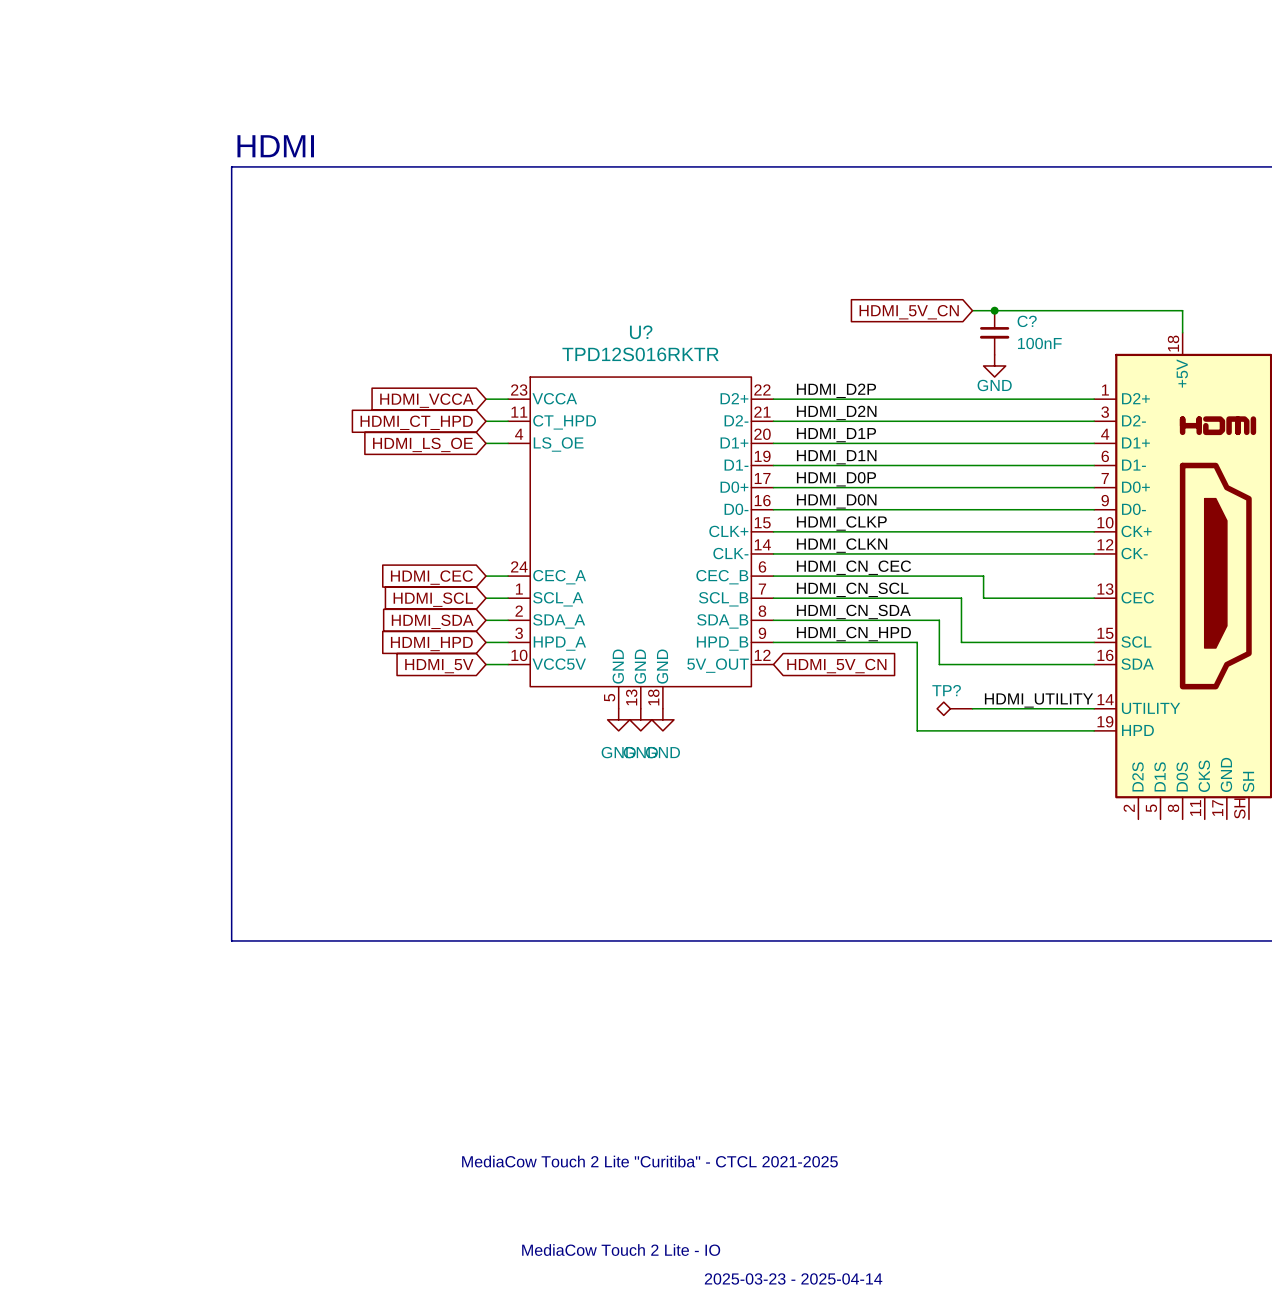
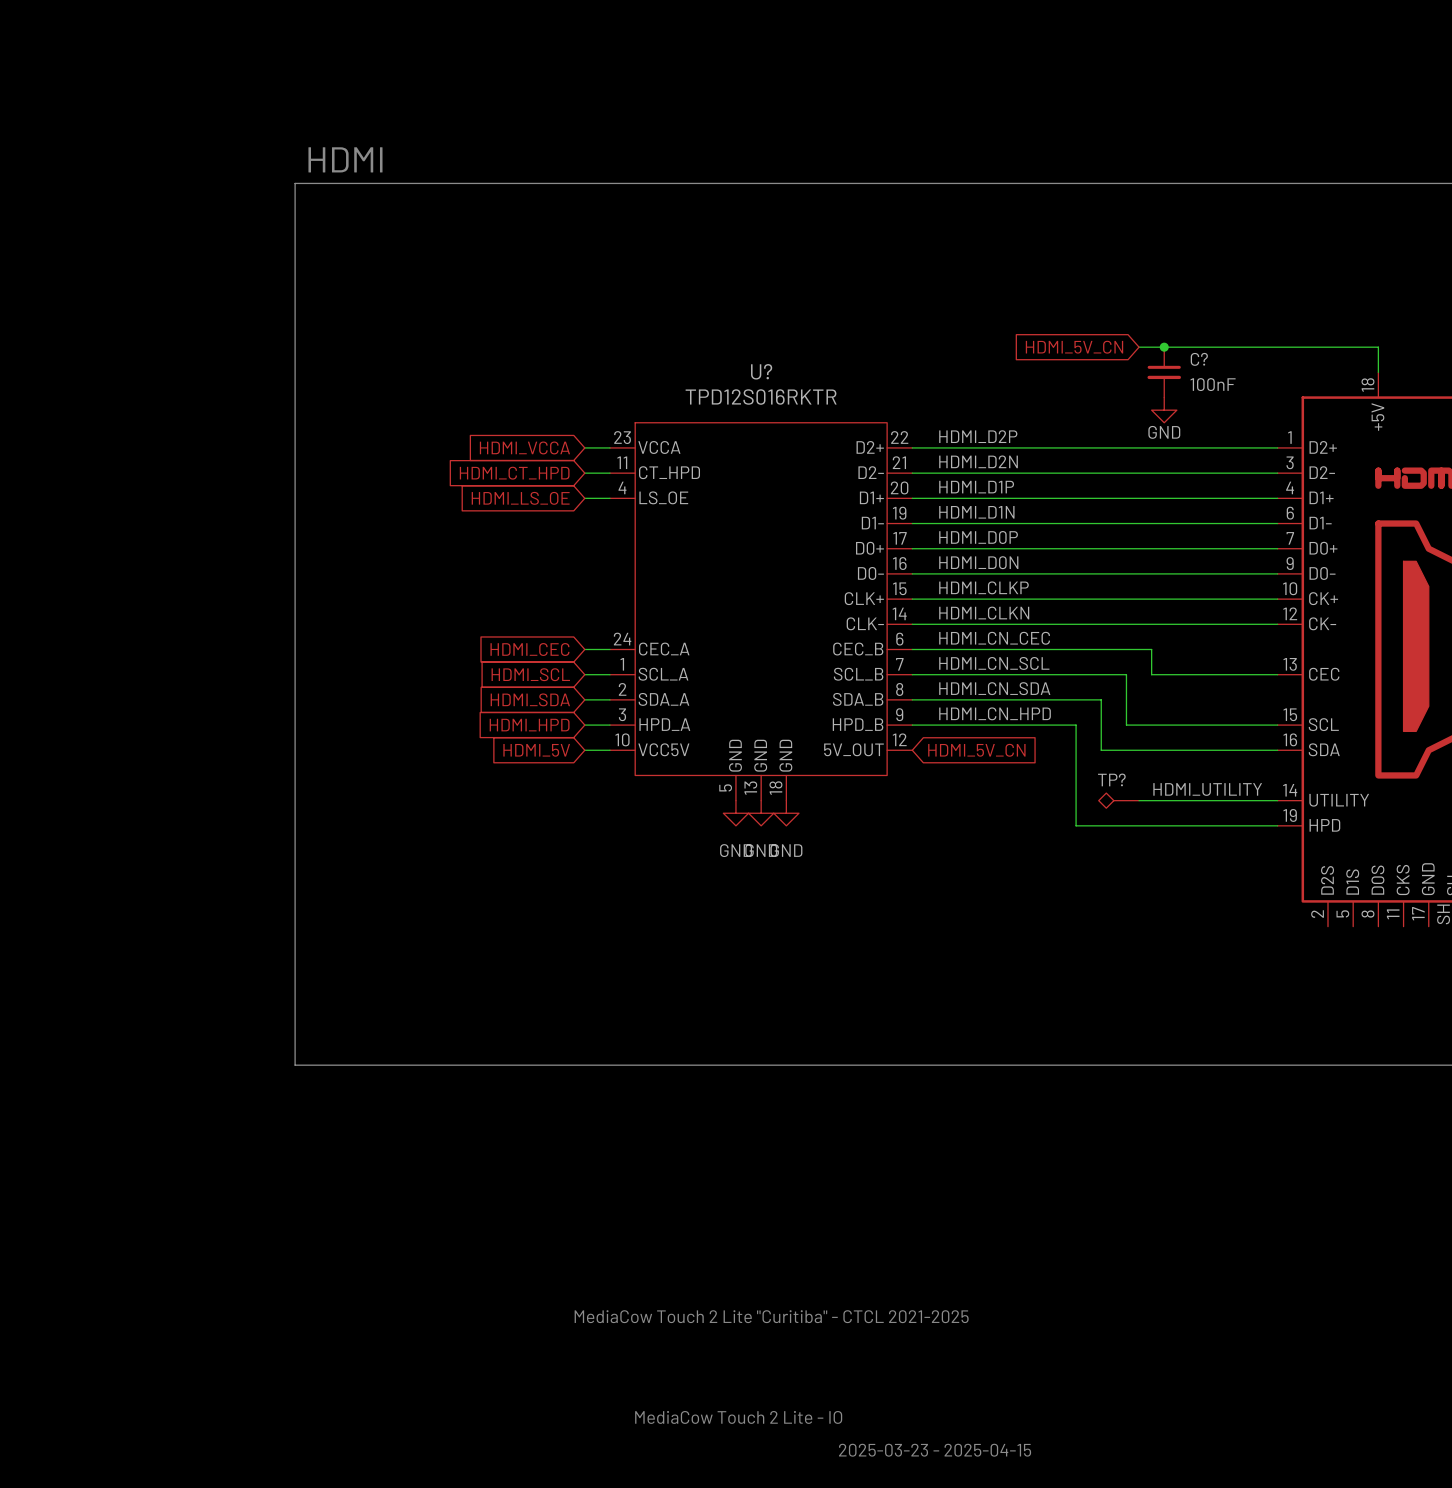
text: 2025-03-23 - 2025-04-14 (793, 1278) -> 2025-03-23 - 2025-04-15 (935, 1450)

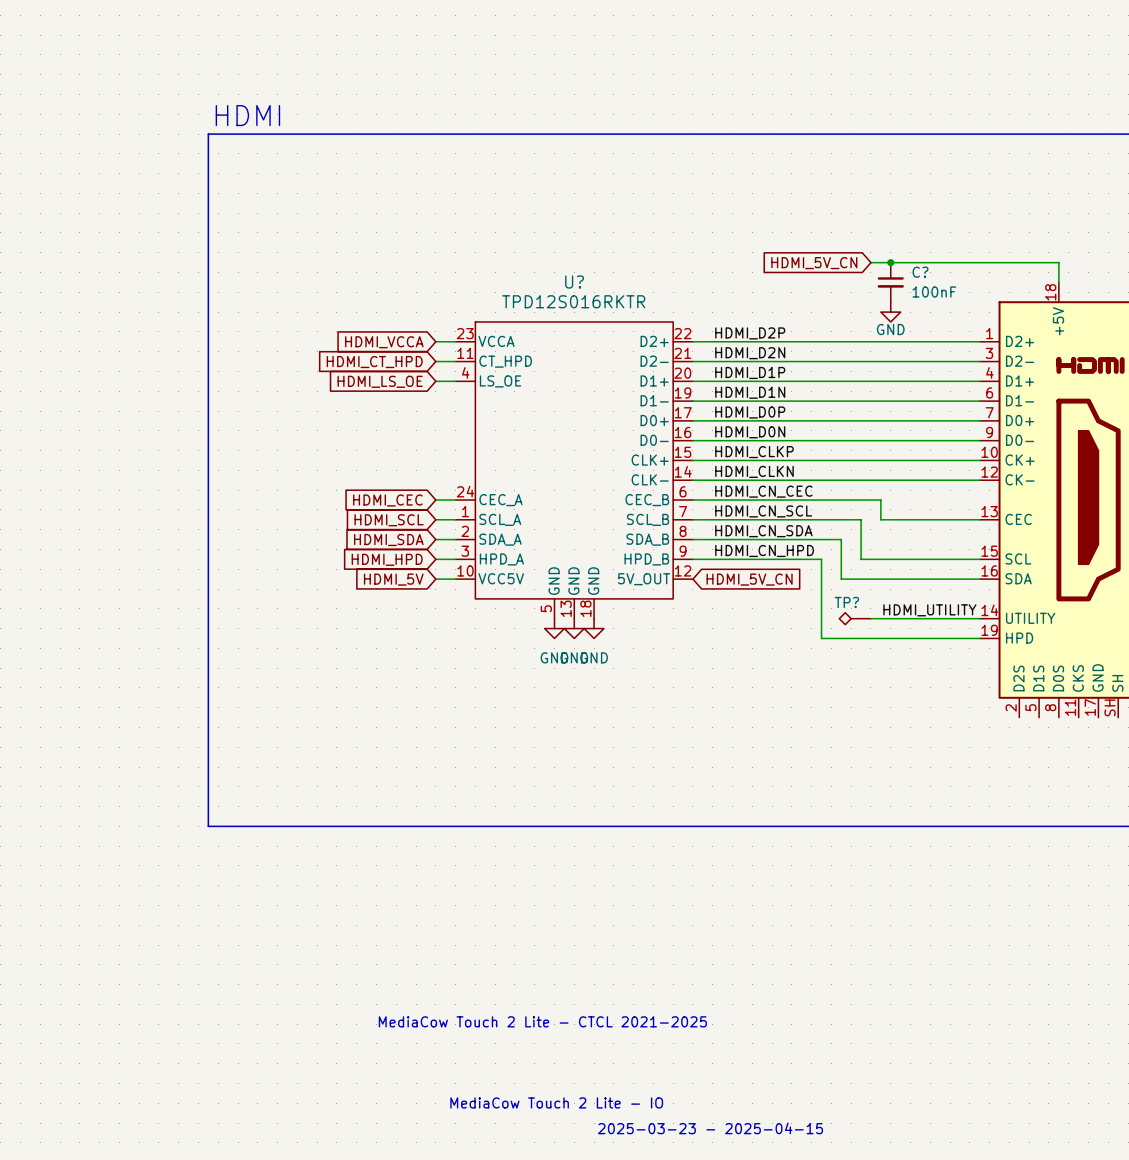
text: MediaCow Touch 2 Lite "Curitiba" - CTCL 2021-2025 (771, 1316) -> MediaCow Touch 2 Lite - CTCL 2021-2025 (542, 1021)

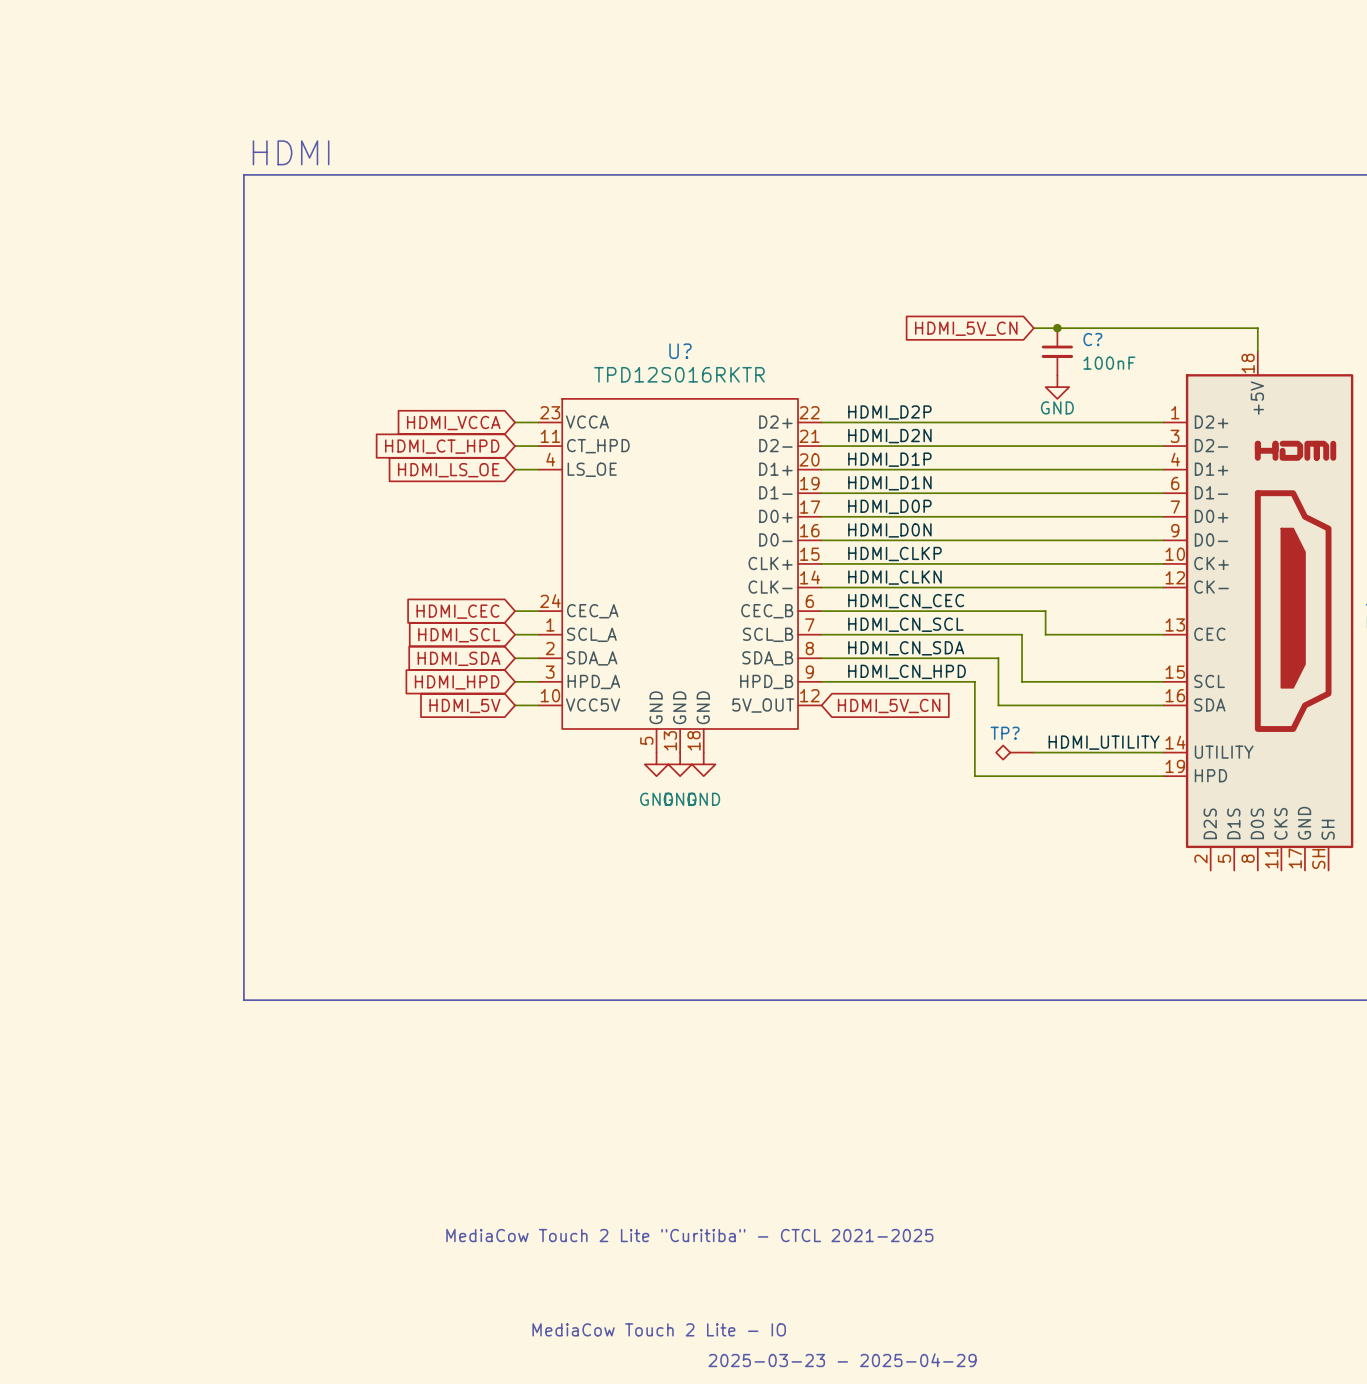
text: MediaCow Touch 2 Lite - CTCL 2021-2025 (542, 1021) -> MediaCow Touch 2 Lite "Curitiba" - CTCL 2021-2025 (689, 1235)
text: 2025-03-23 - 2025-04-15 (710, 1128) -> 2025-03-23 - 2025-04-29 (842, 1360)

